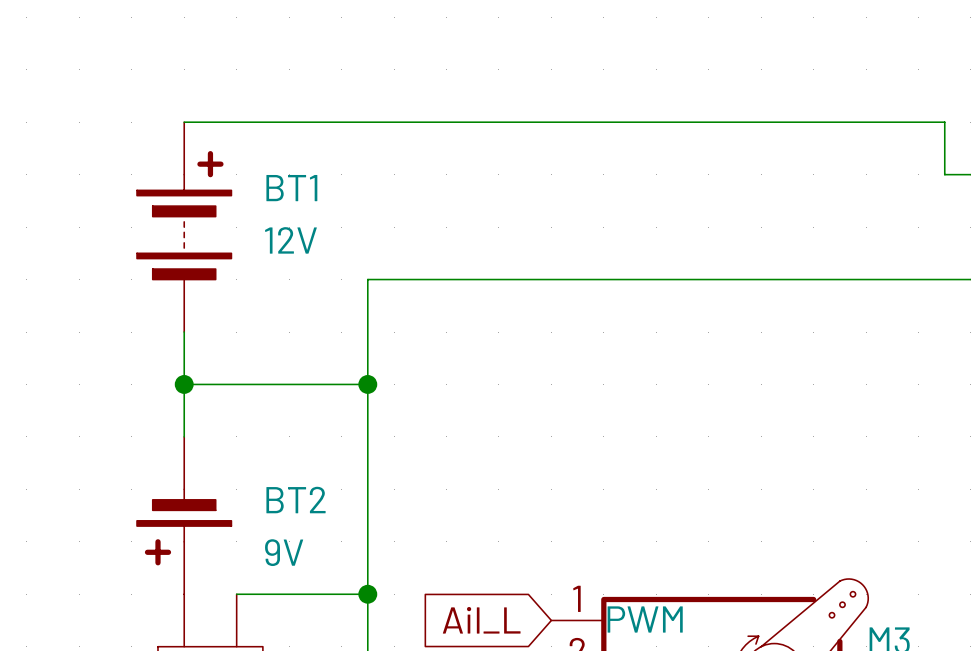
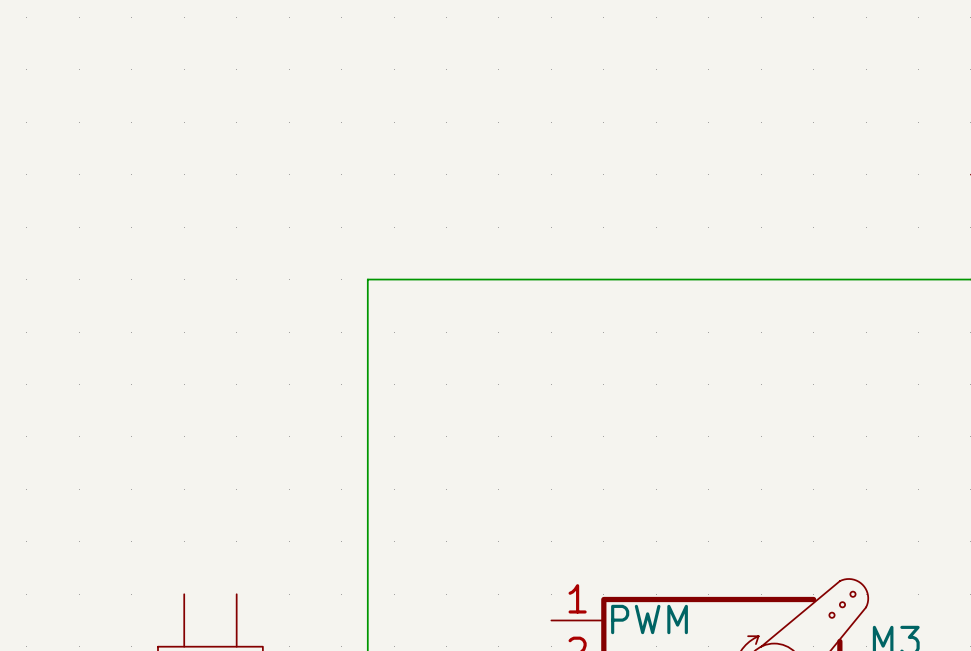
wire: (184, 122) (944, 122) (944, 174) (970, 174) -> none
BT1: 12V (184, 227) -> none
wire: (184, 332) (184, 436) -> none
wire: (184, 384) (367, 384) -> none
junction: (184, 384) -> none
junction: (367, 384) -> none
BT2: 9V (184, 515) -> none
wire: (236, 594) (367, 594) -> none
junction: (367, 594) -> none
global label: Ail_L (481, 620) -> none

